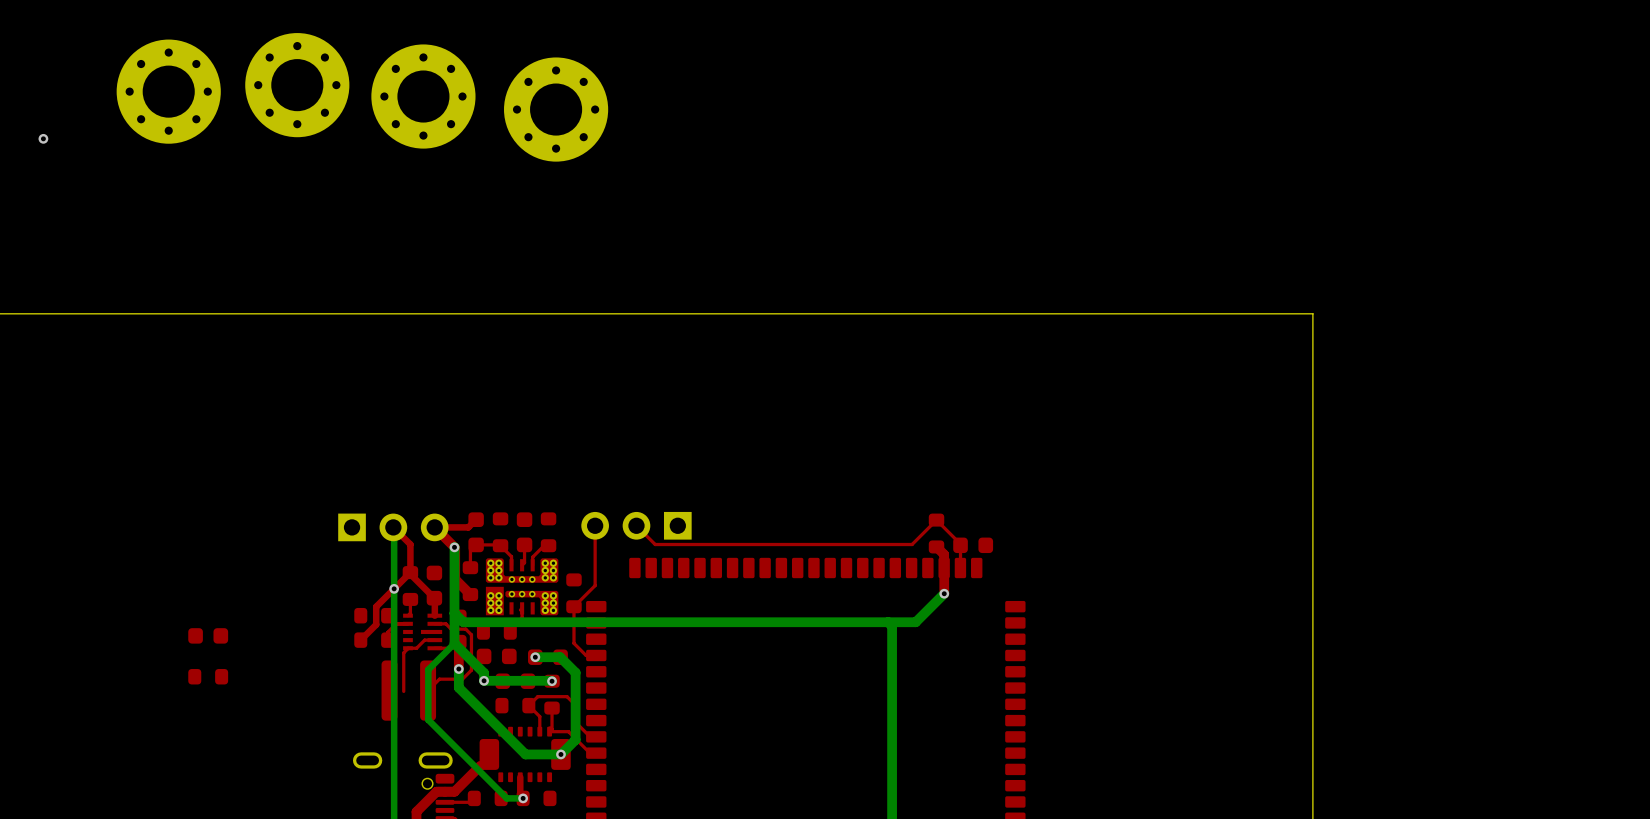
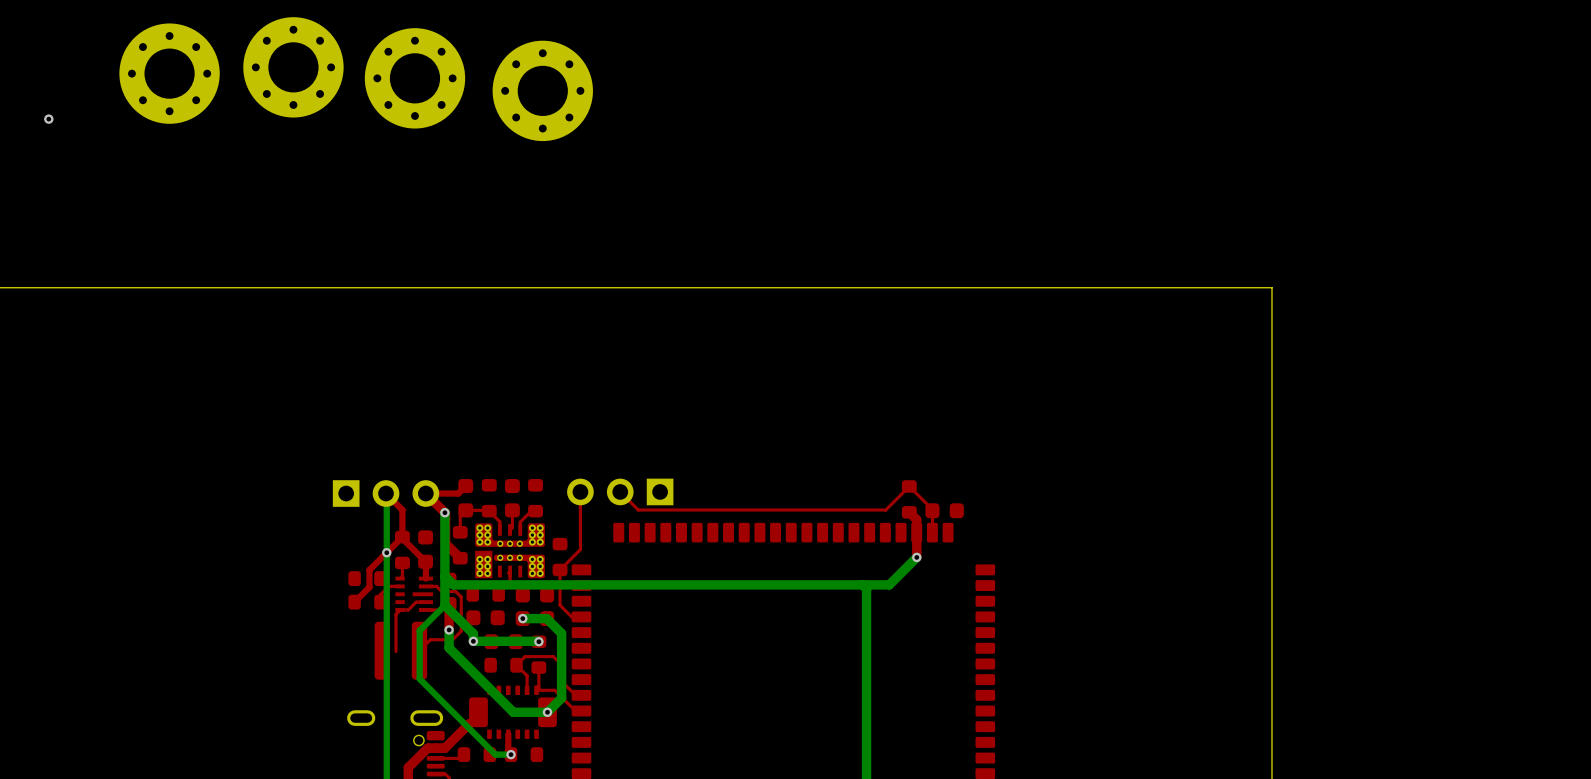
part position: (208, 635) -> (534, 595)
part: (208, 676) -> none

